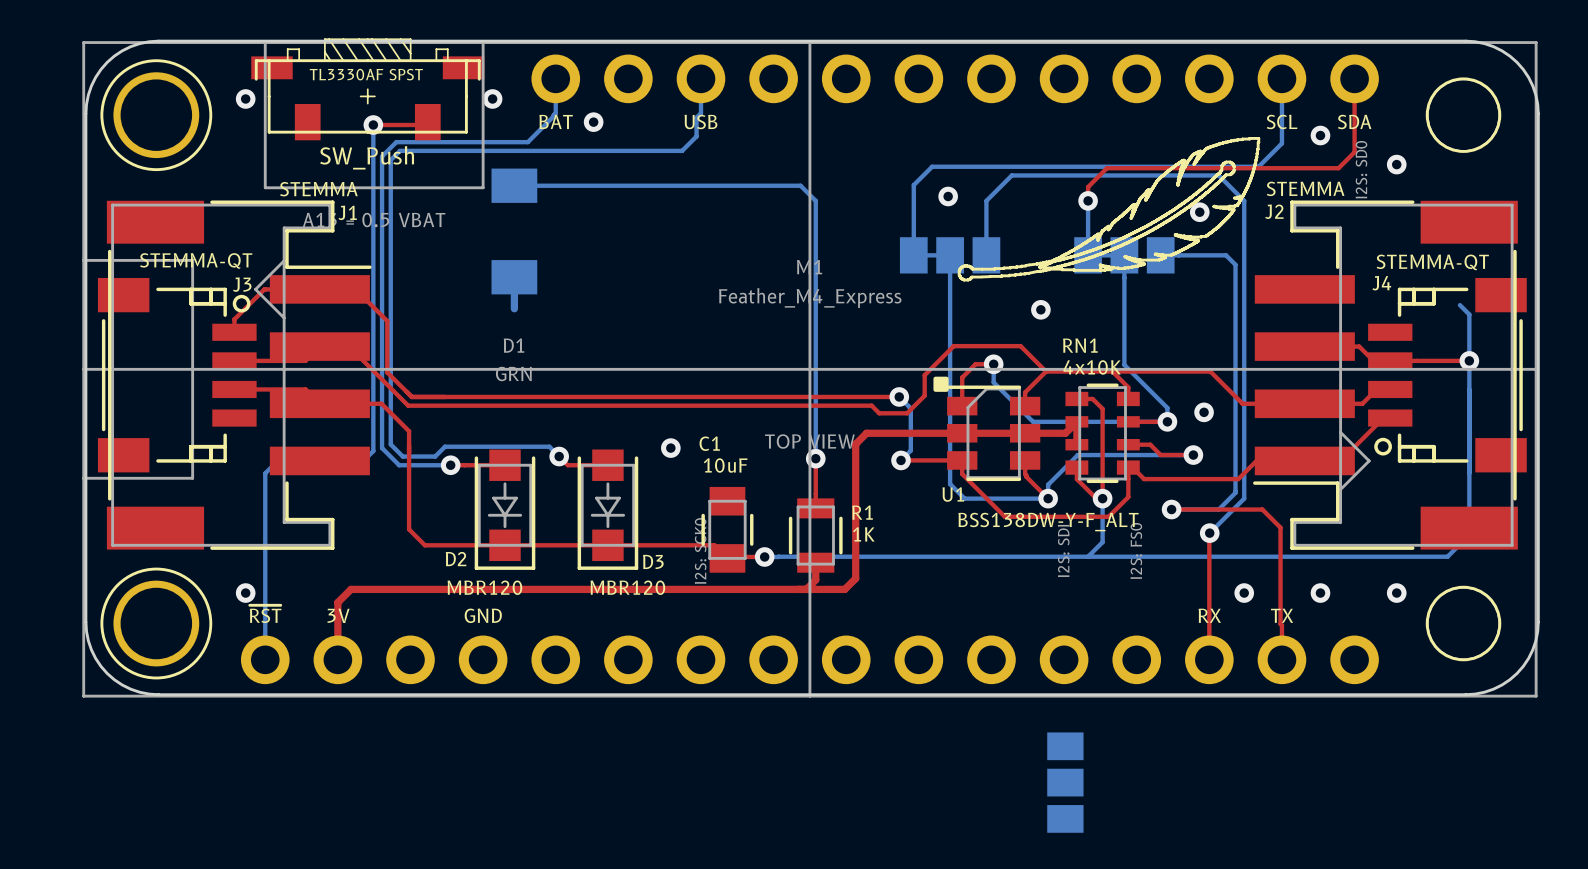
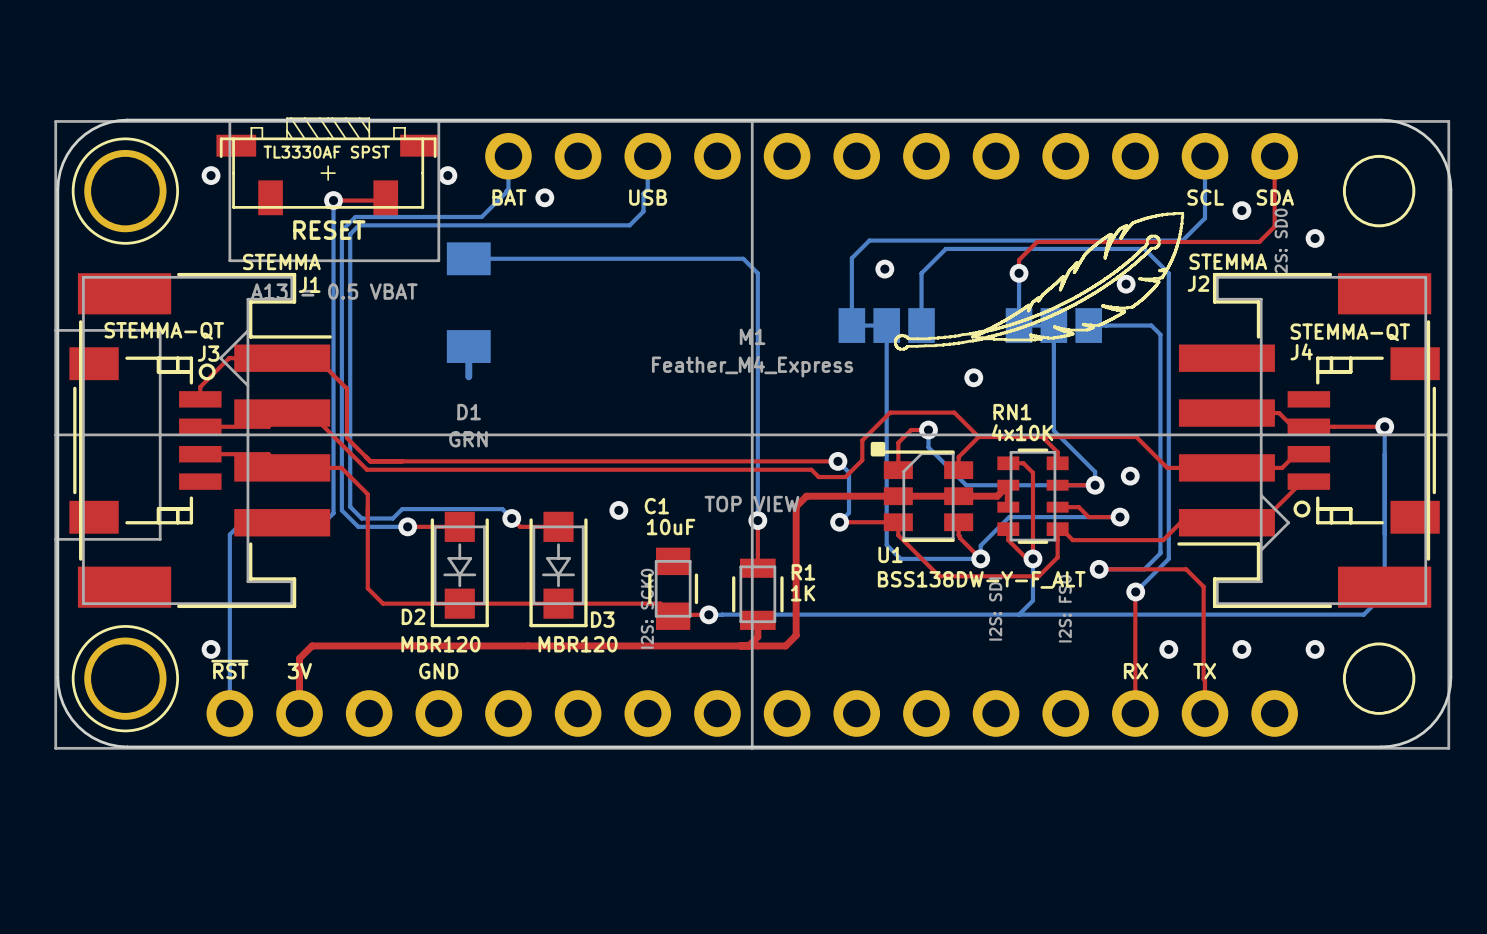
part value: SW_Push (367, 157) -> RESET (329, 230)
bottom track: (1459, 305) (1469, 314) (1469, 360) -> none
part: (1065, 782) -> none

